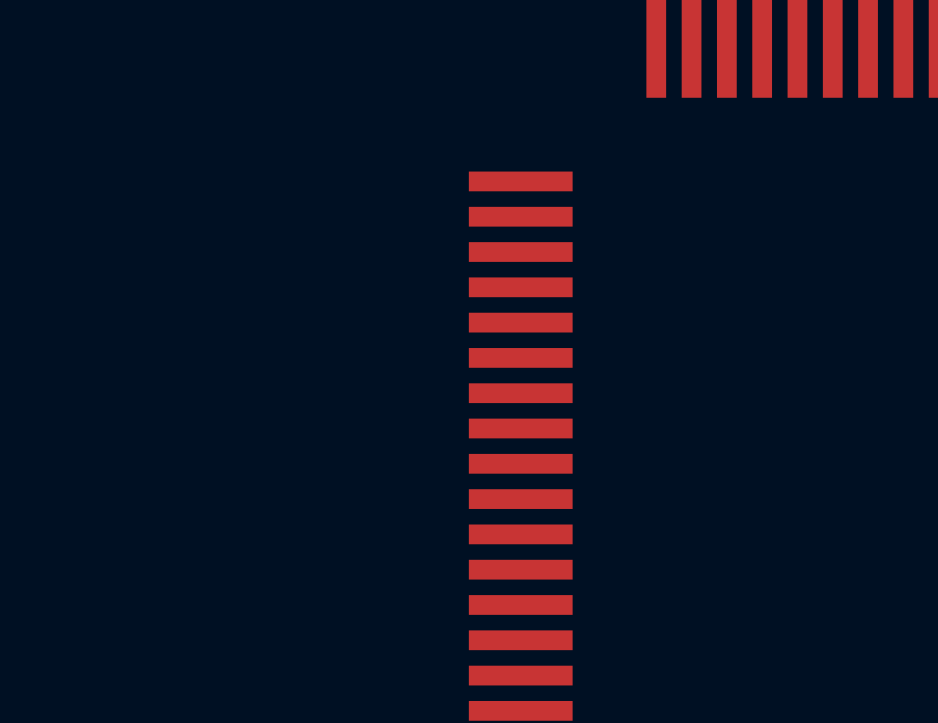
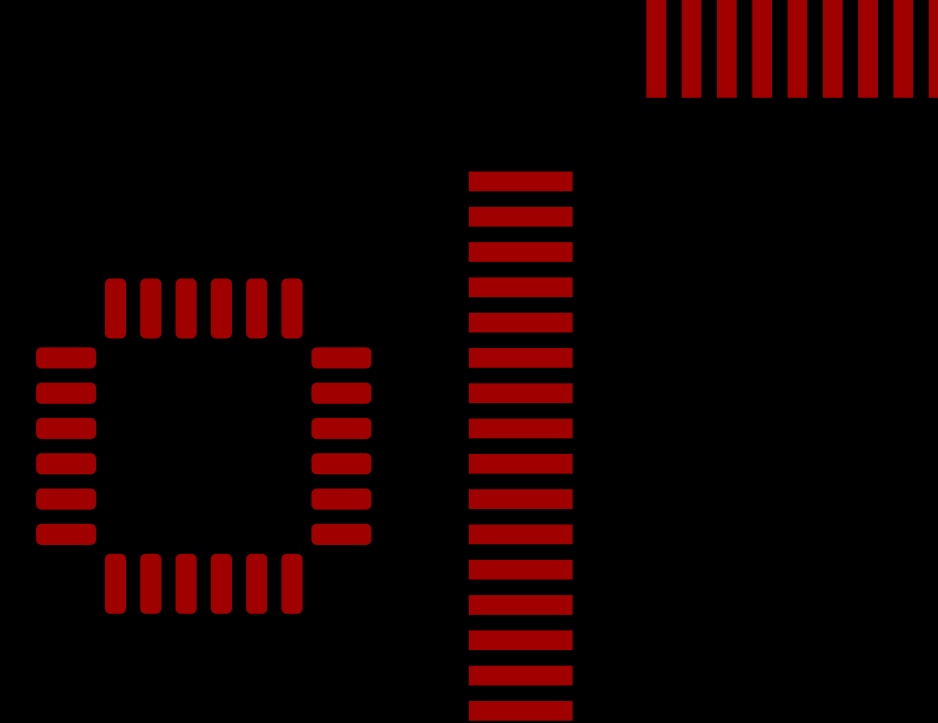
part: none -> (203, 446)

